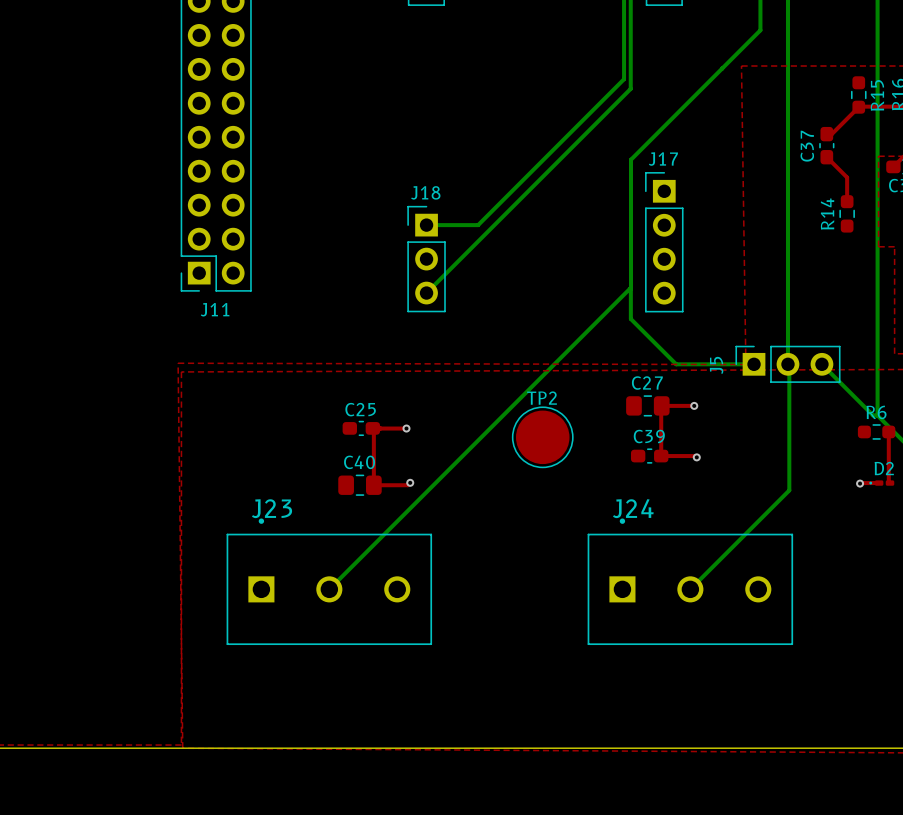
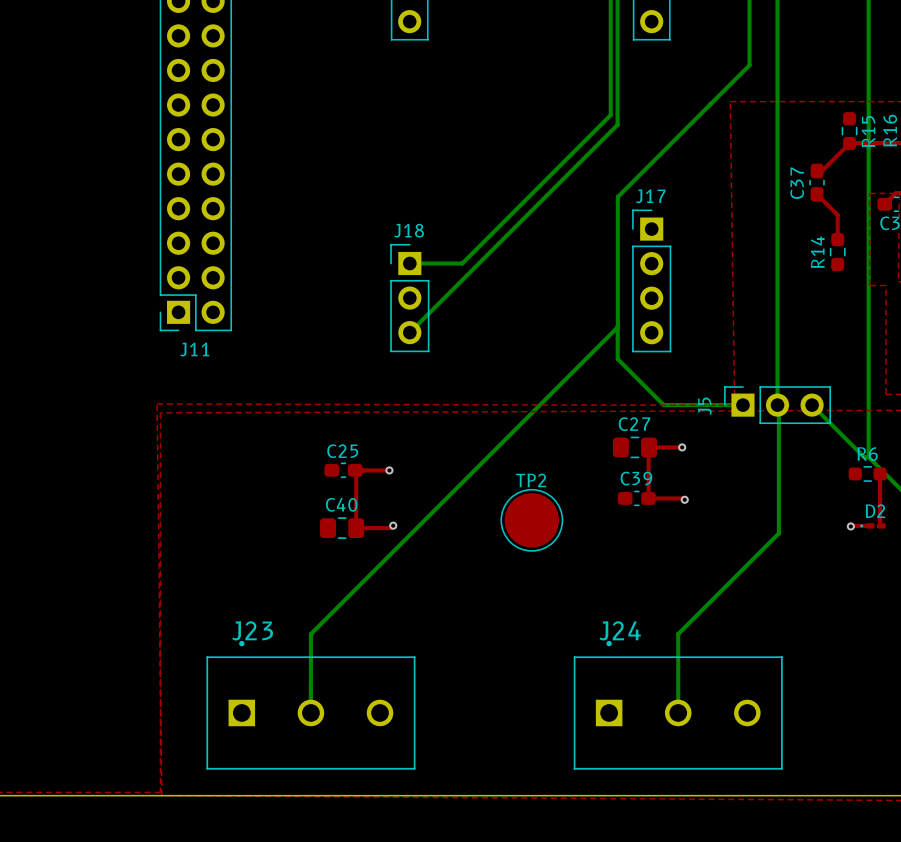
TP2 position: (542, 437) -> (531, 520)
J23 position: (329, 581) -> (310, 705)
J24 position: (690, 581) -> (678, 705)
bottom track: none -> (310, 634) (310, 712)
bottom track: none -> (678, 634) (678, 712)

